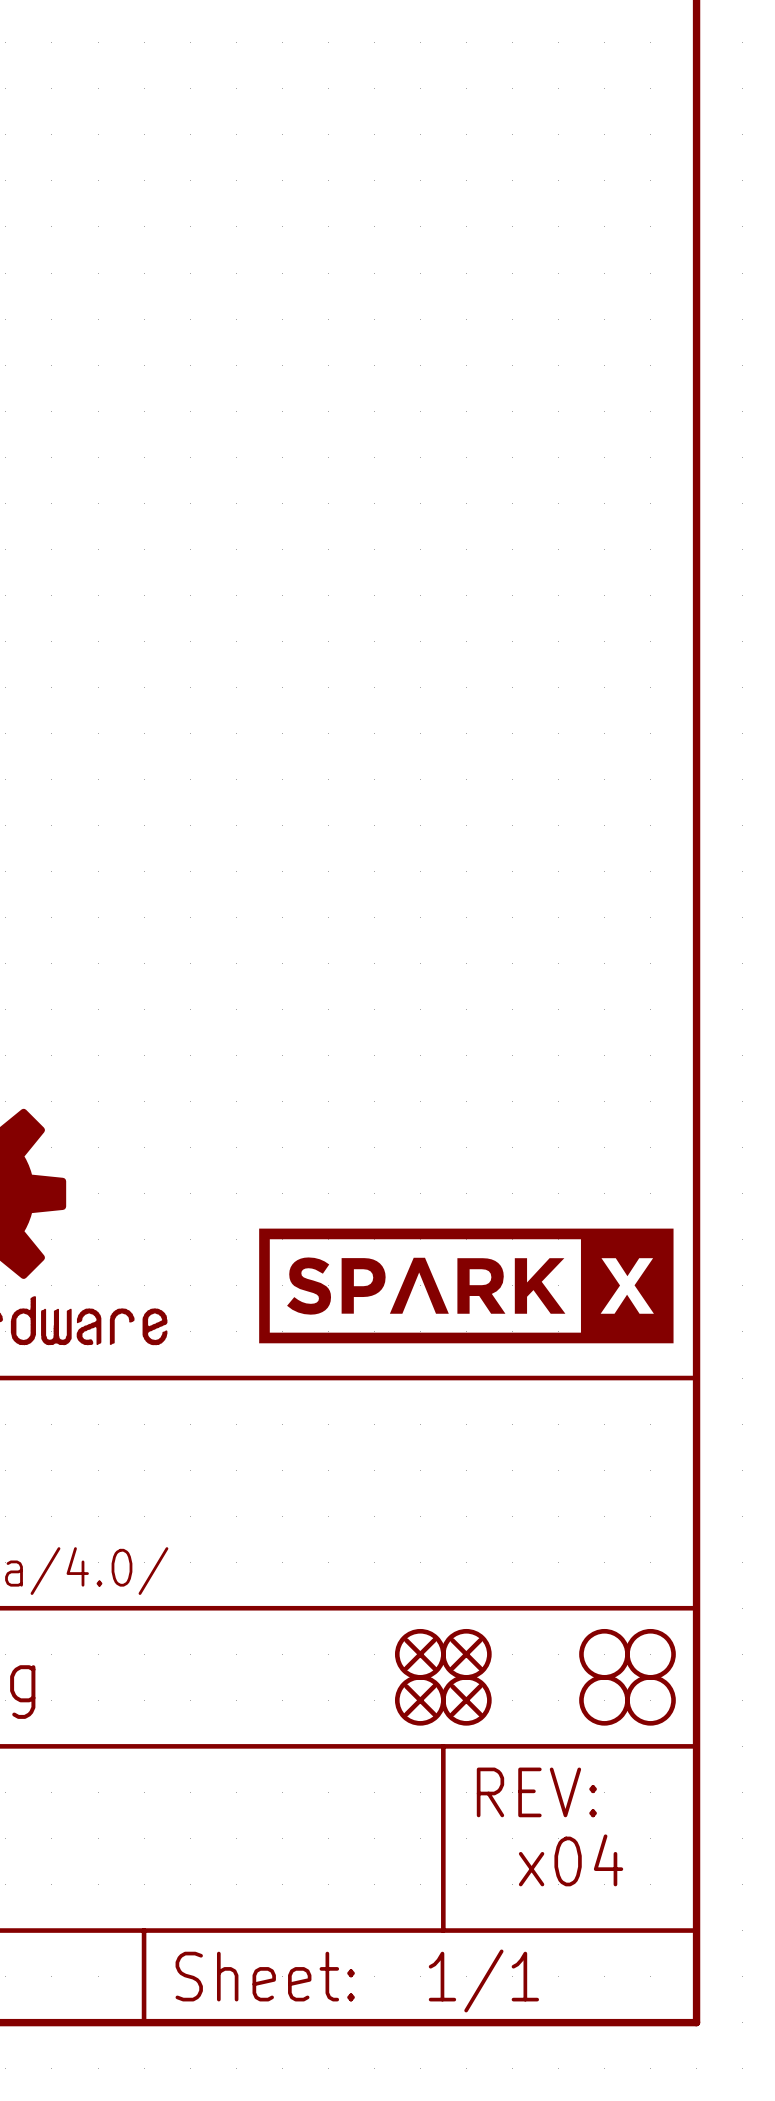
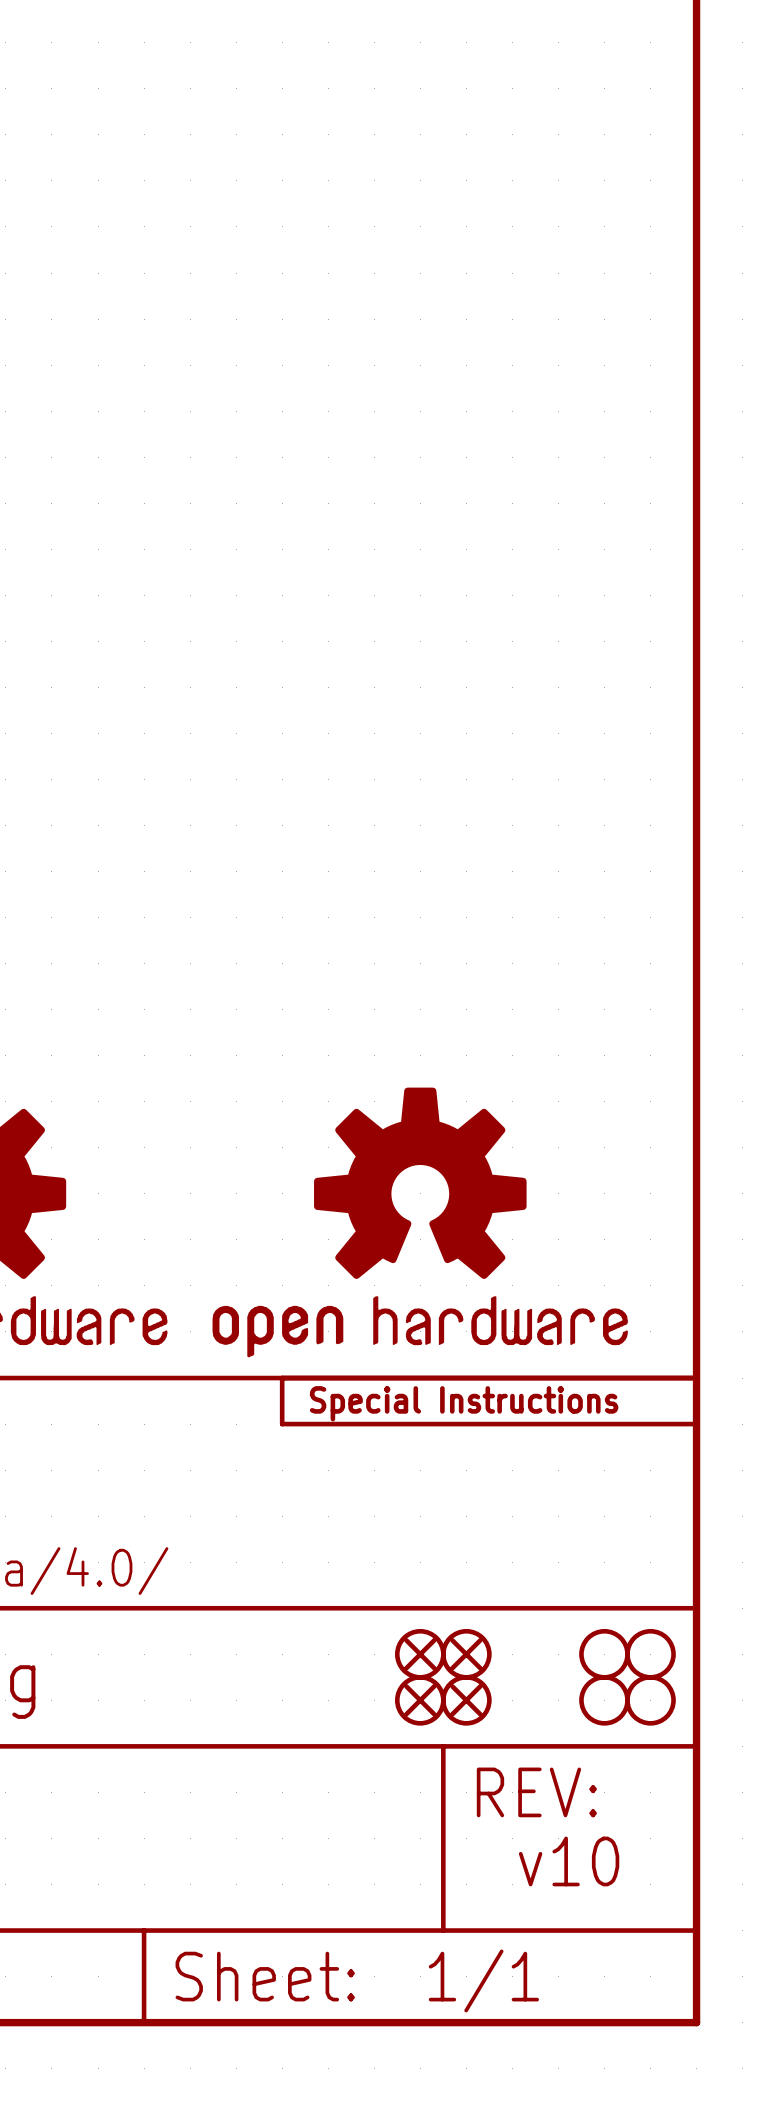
part: none -> (420, 1222)
part: (466, 1285) -> none
part: none -> (489, 1401)
text: x04 (571, 1860) -> v10 (569, 1861)

